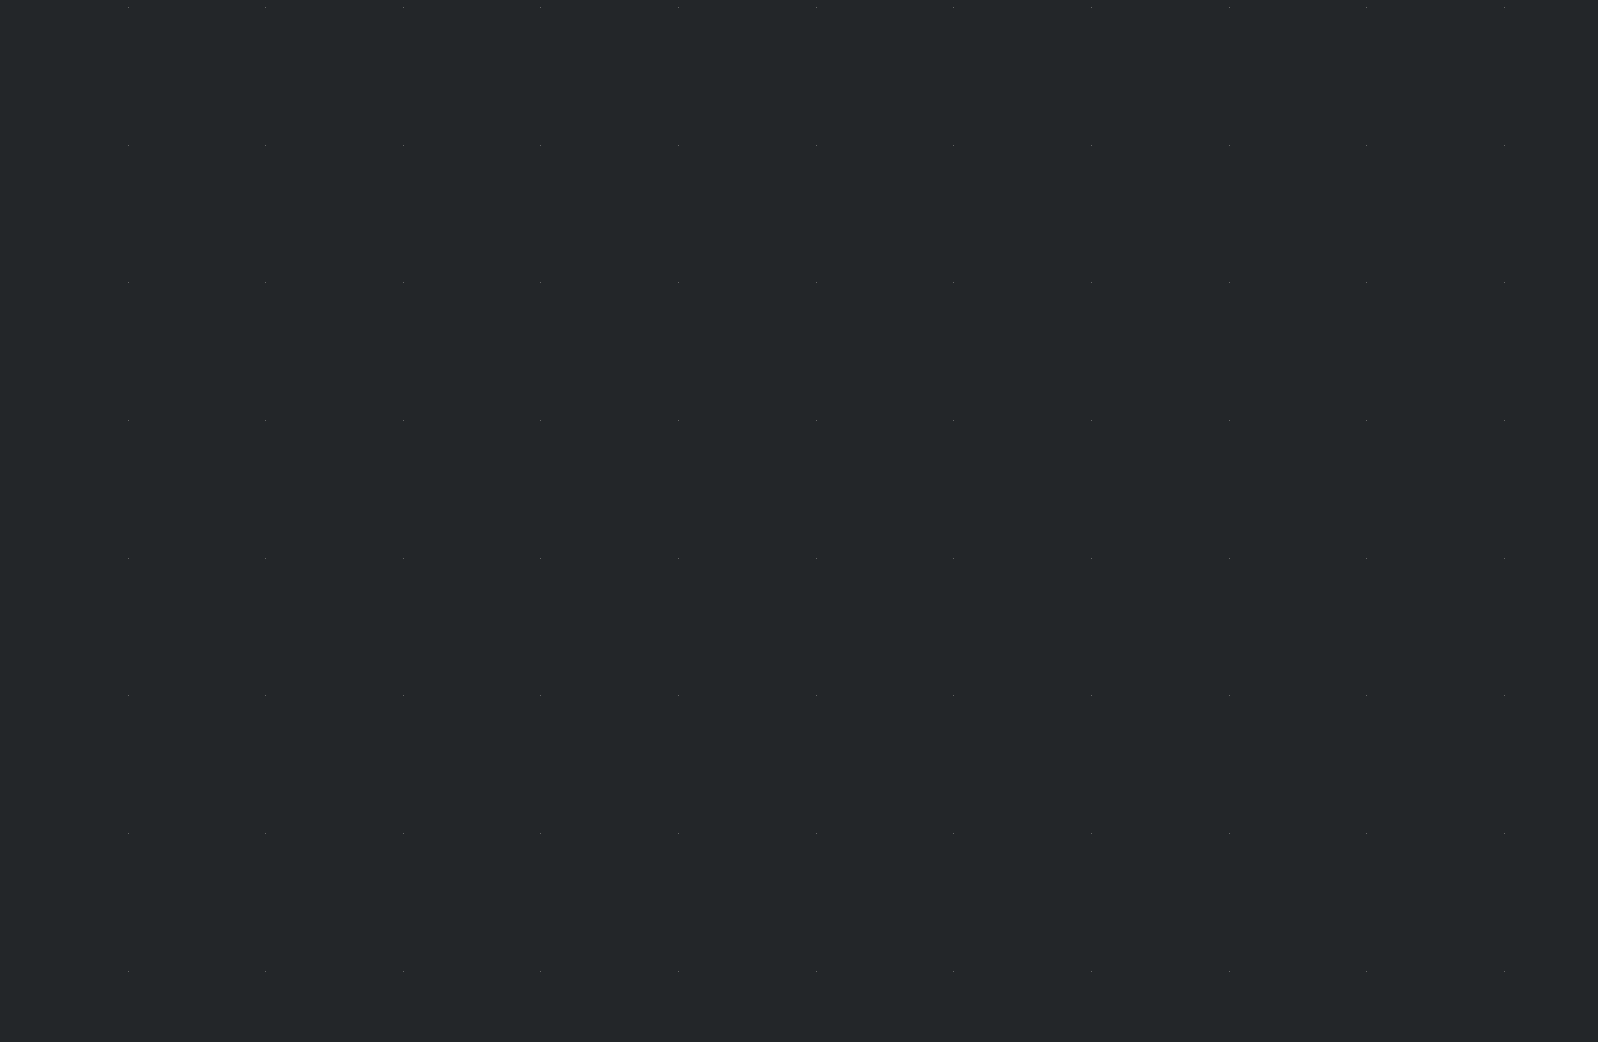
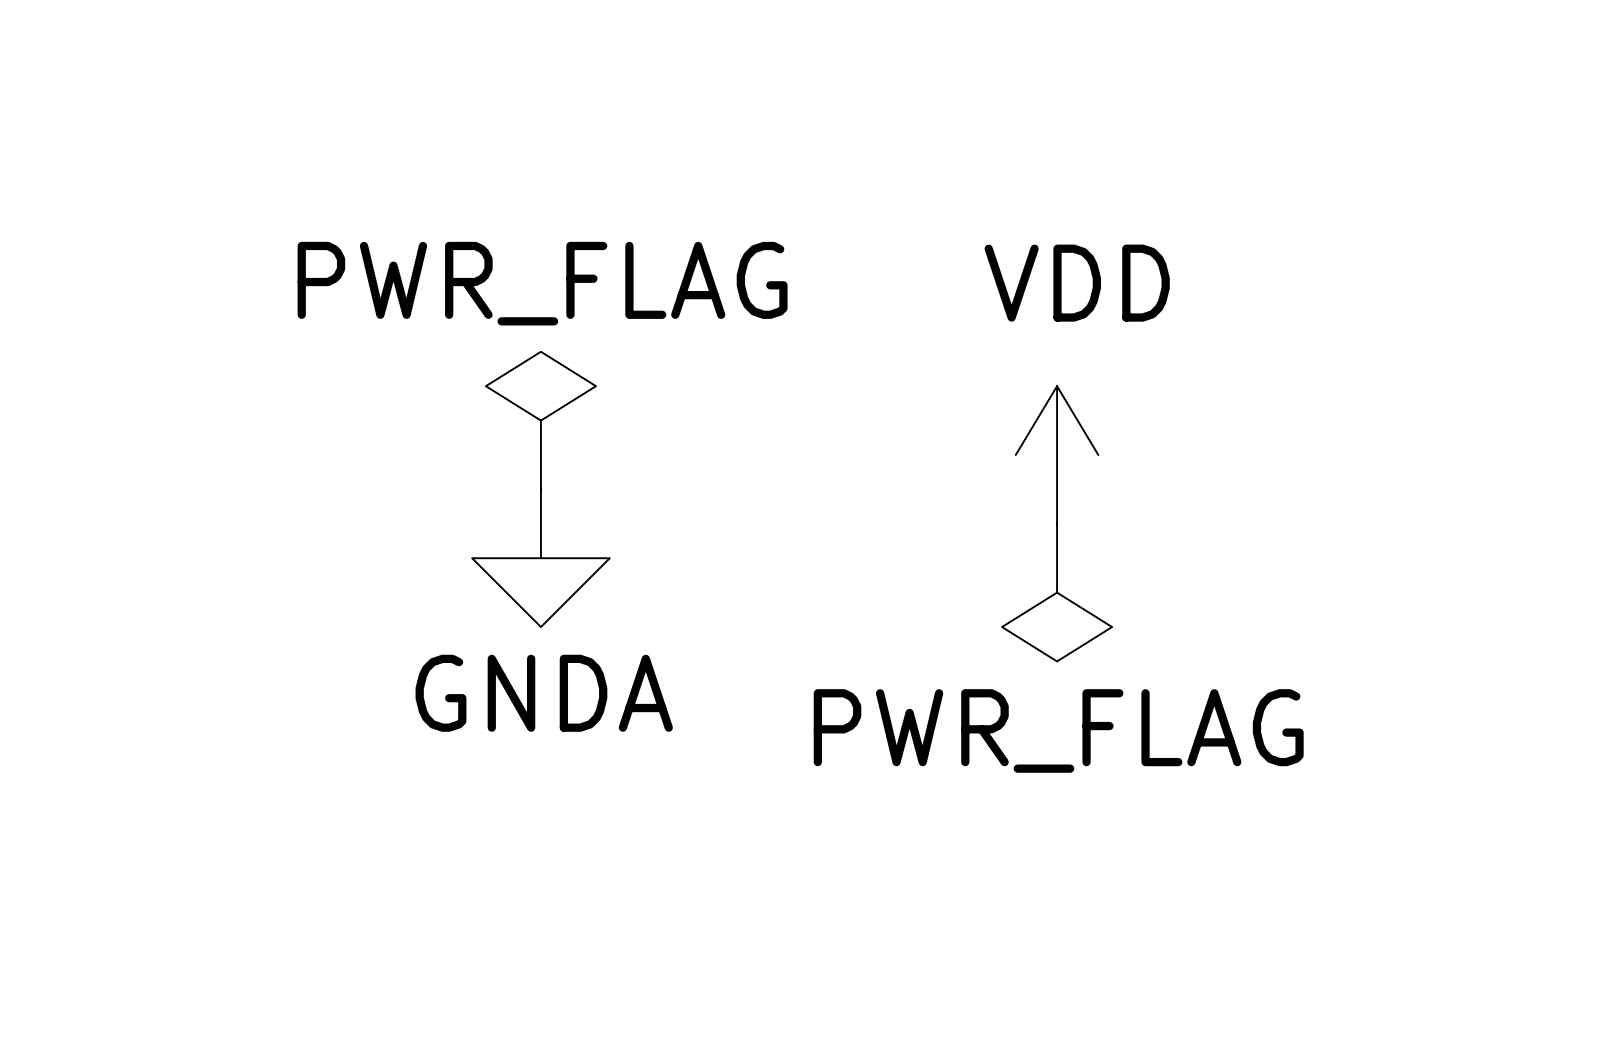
power symbol: none -> PWR_FLAG (540, 420)
power symbol: none -> VDD (1057, 454)
power symbol: none -> GNDA (540, 558)
power symbol: none -> PWR_FLAG (1057, 592)

